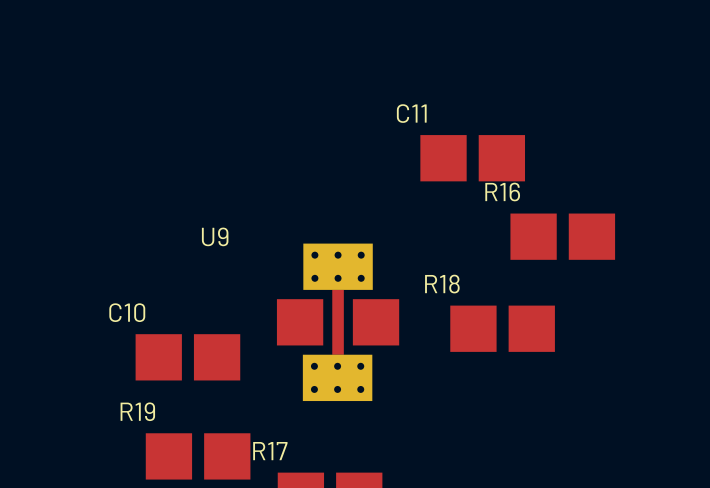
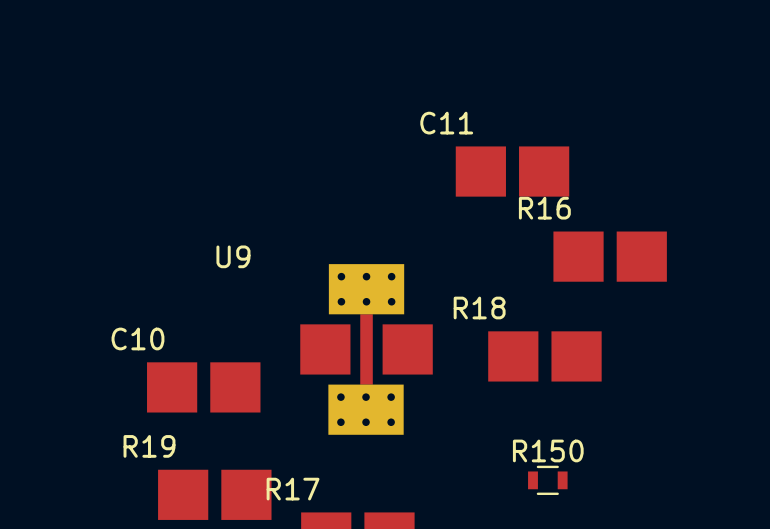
R150: none -> (547, 480)

